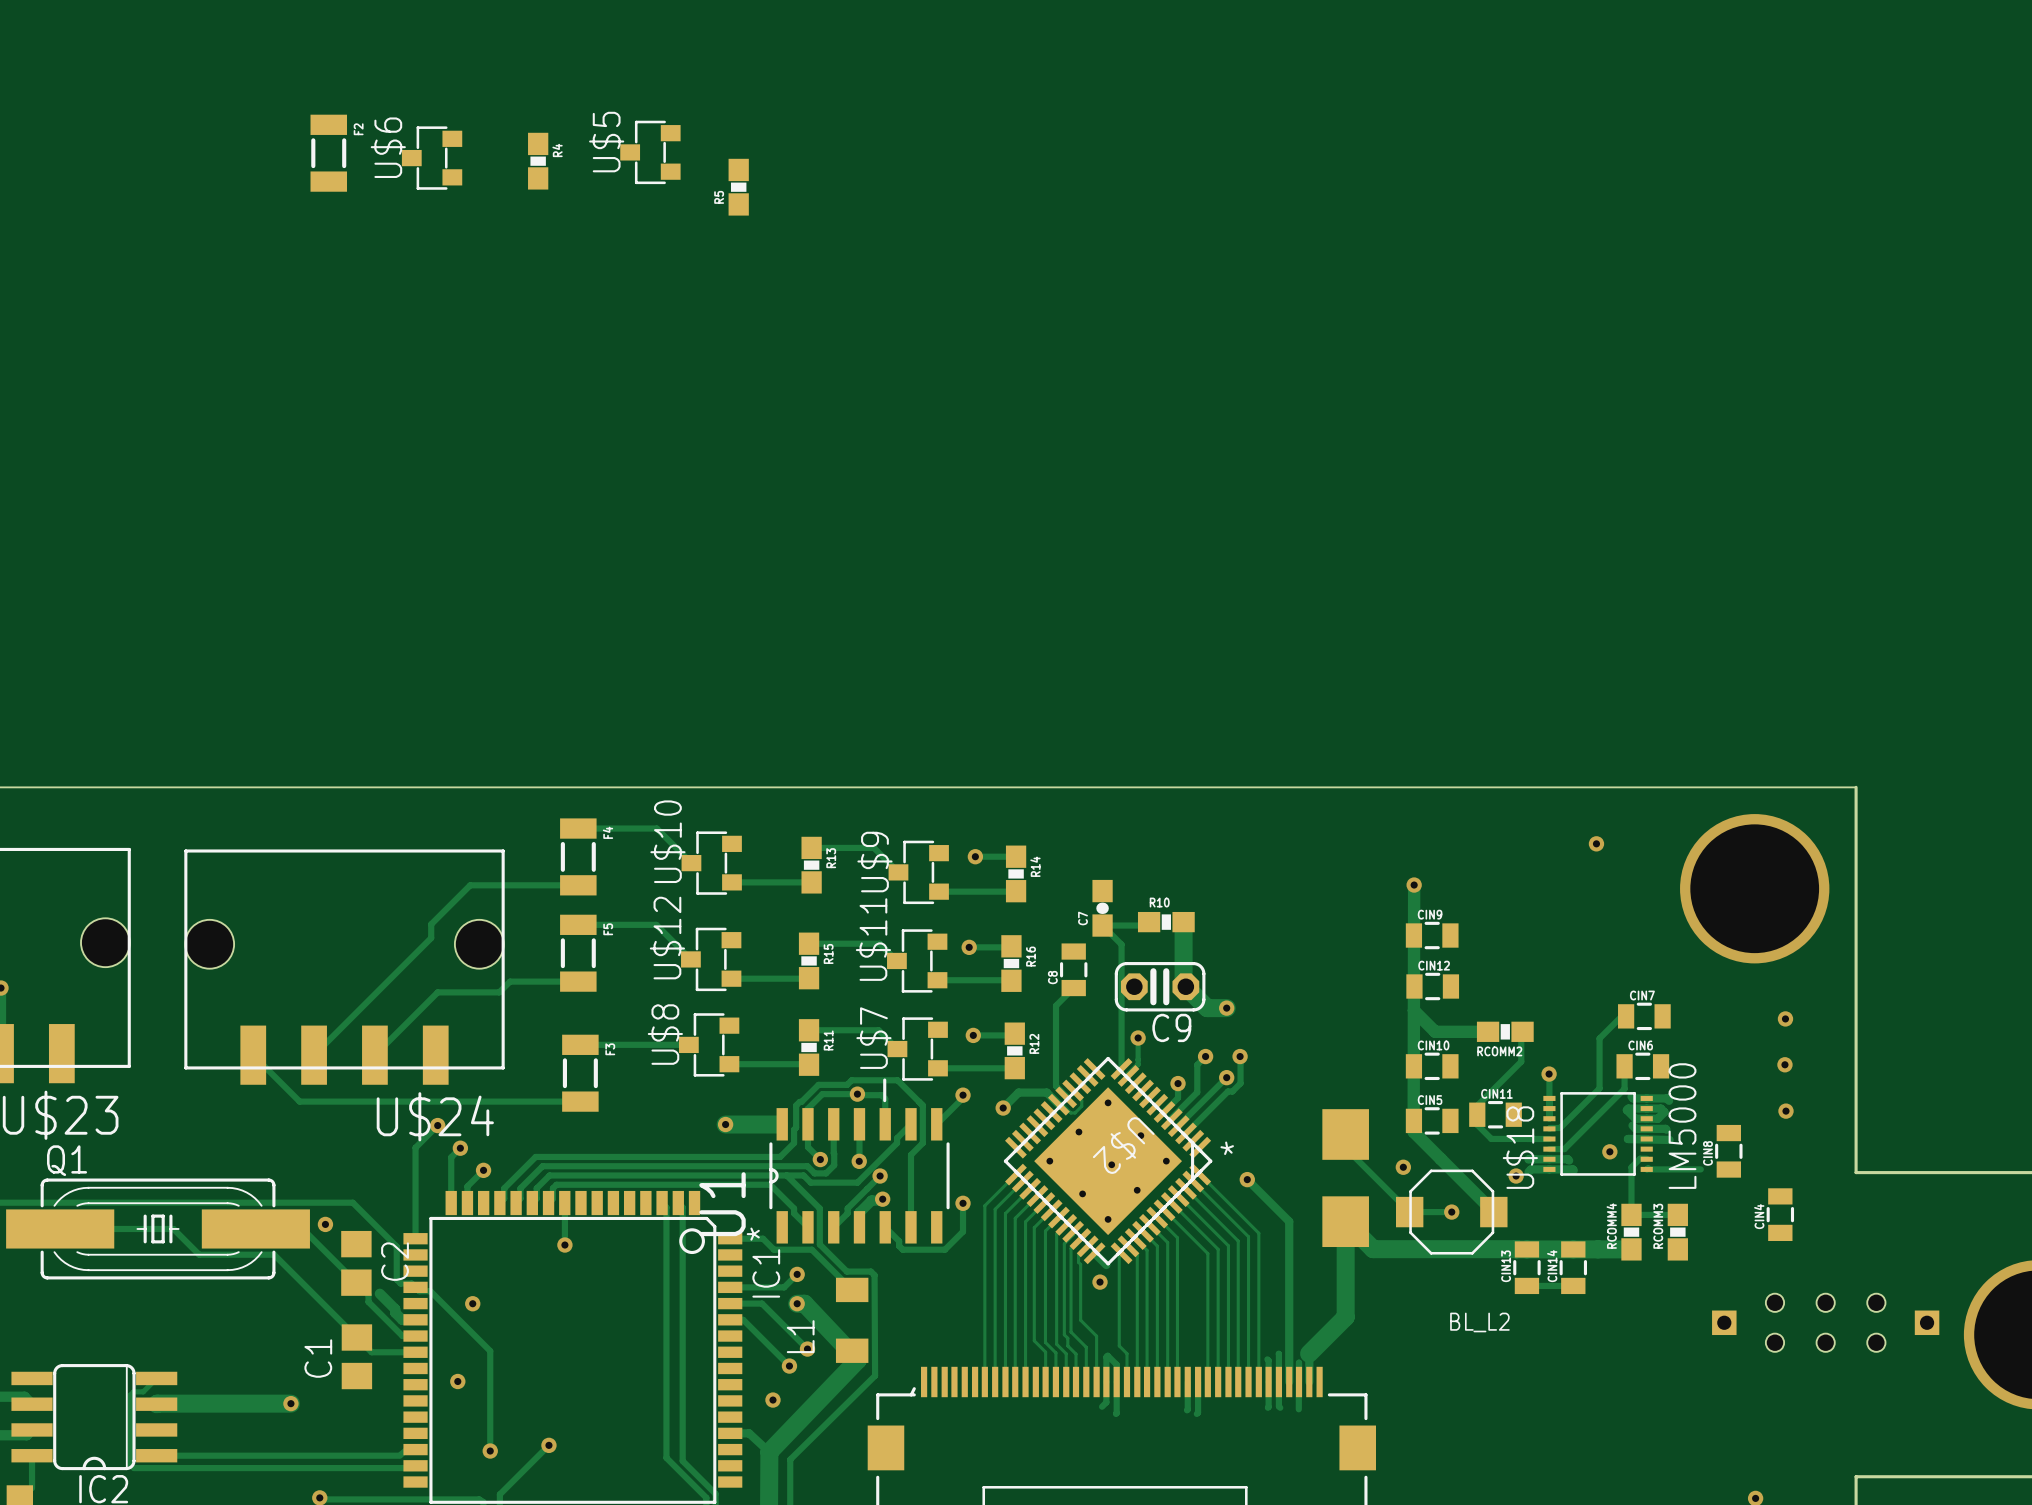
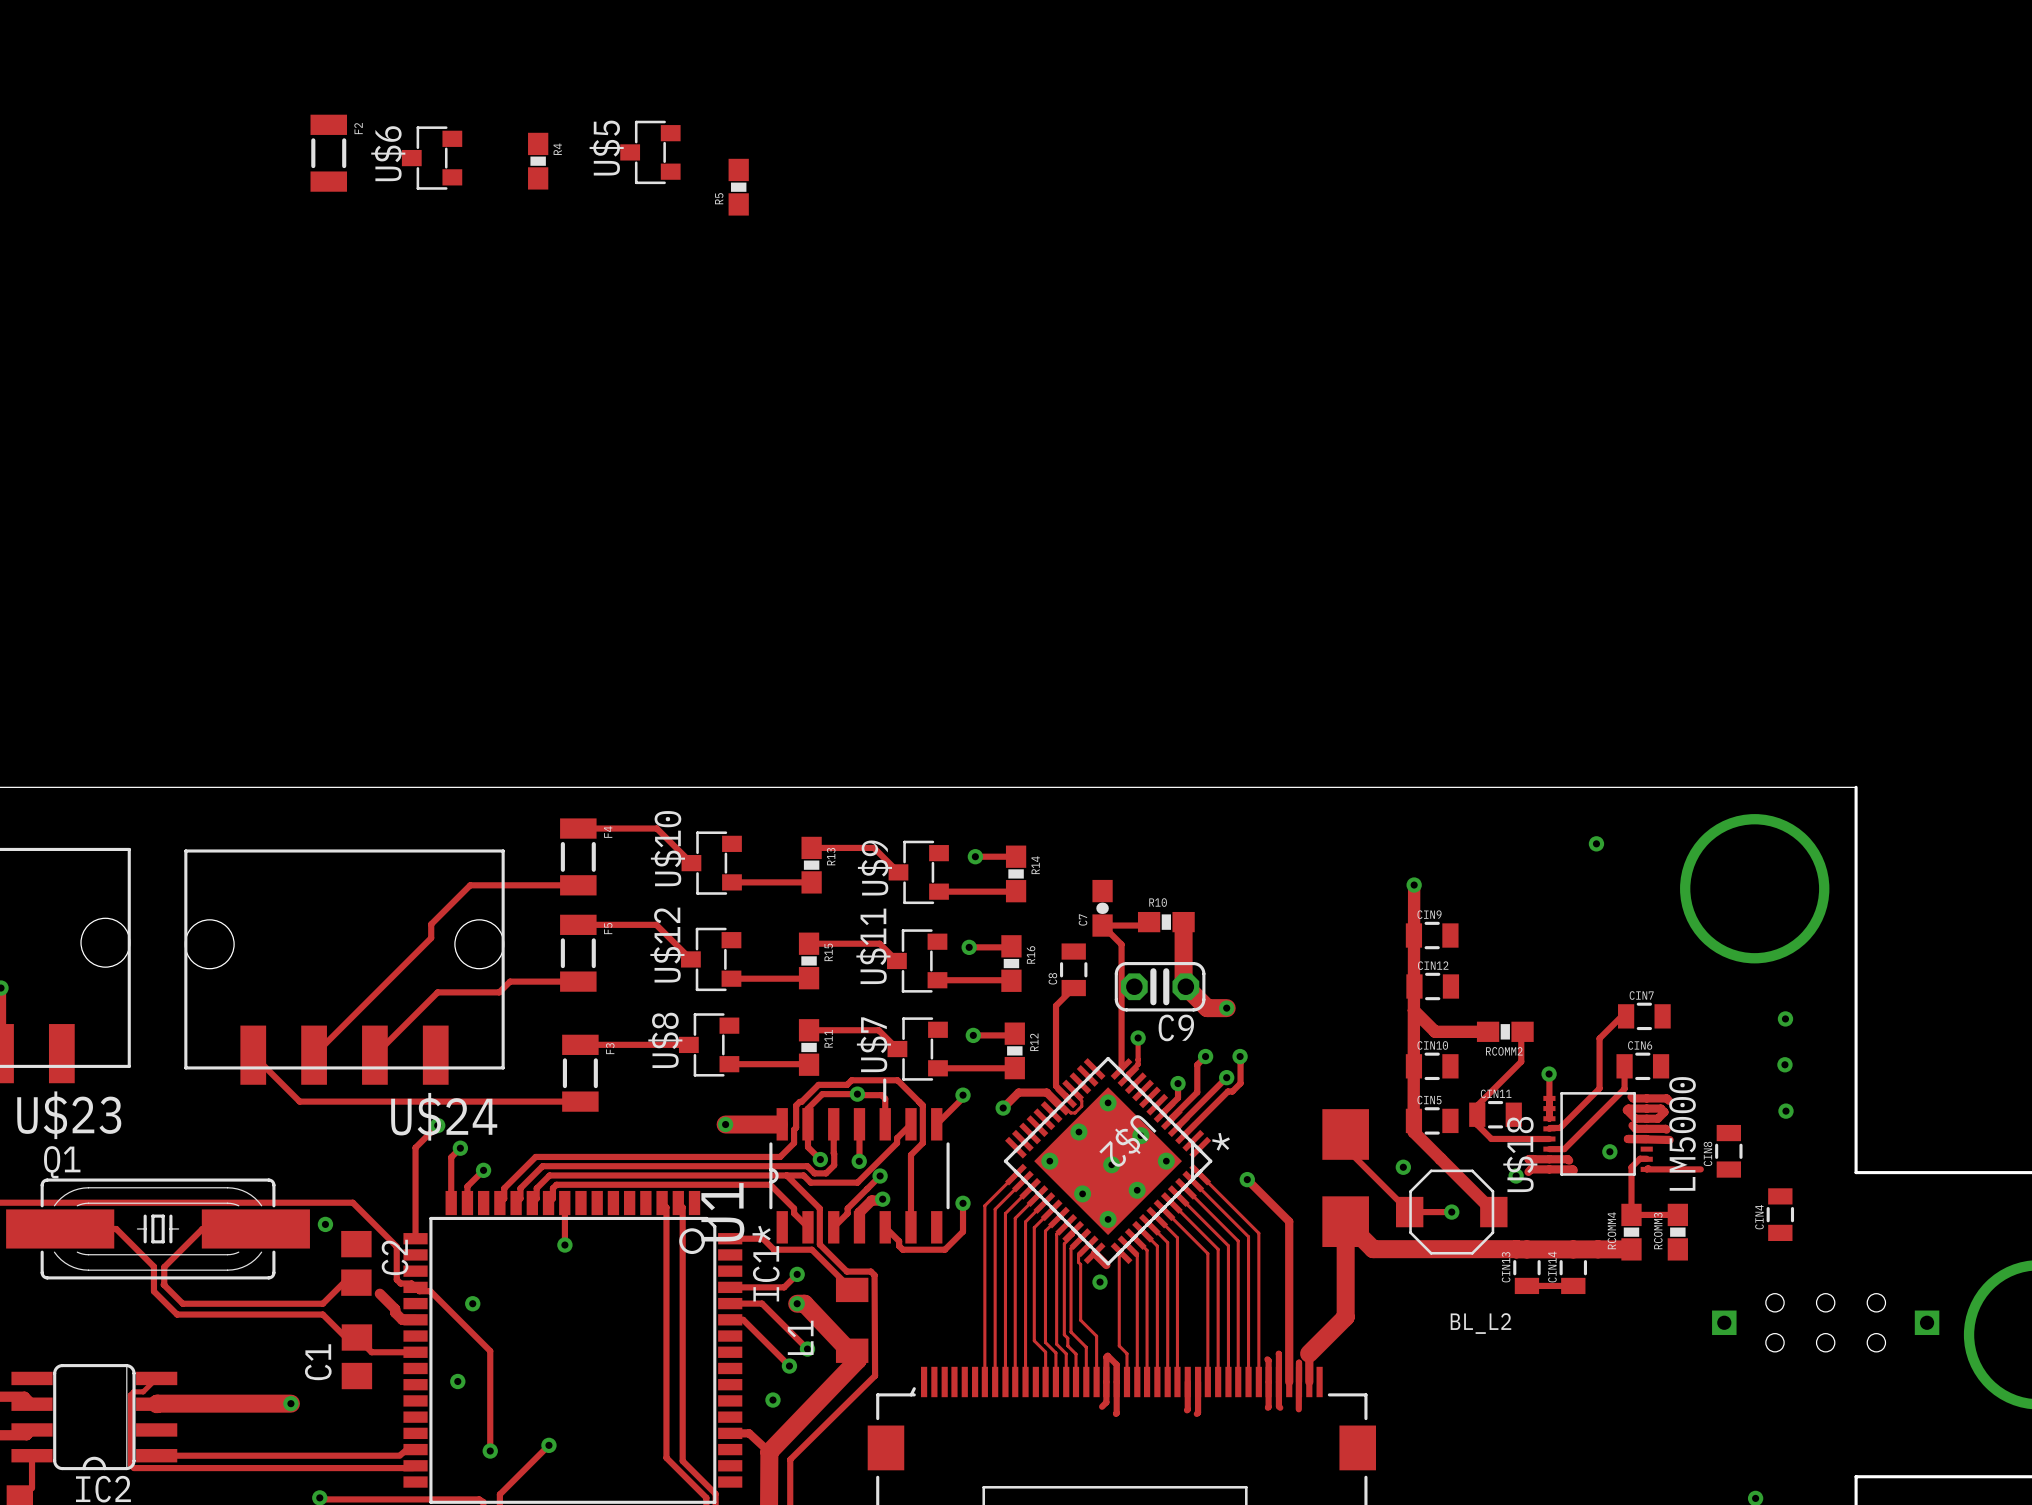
track: (116, 1228) (173, 1228) (199, 1254) (274, 1254) (356, 1337) -> (116, 1228) (153, 1266) (153, 1291) (177, 1314) (322, 1314) (345, 1337) (356, 1337)
track: none -> (255, 1228) (202, 1228) (164, 1267) (163, 1284) (182, 1303) (322, 1303) (343, 1282) (356, 1282)
track: (302, 1228) (368, 1294) (368, 1302) (402, 1336) (415, 1336) -> none

